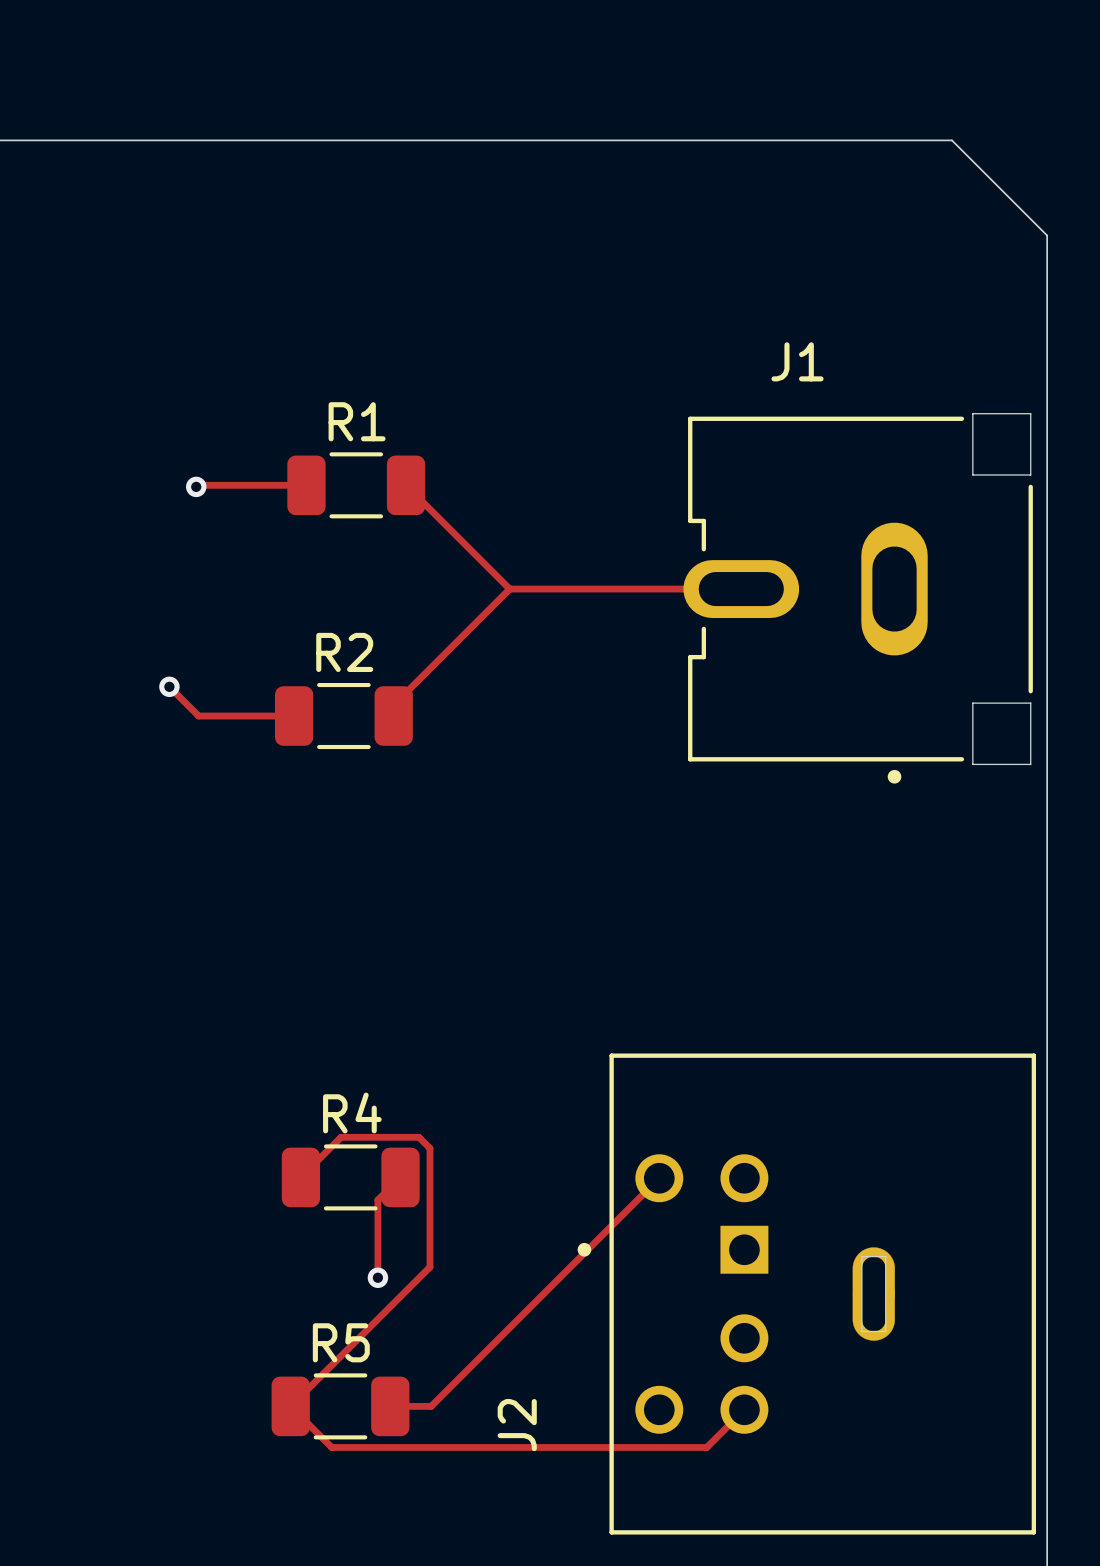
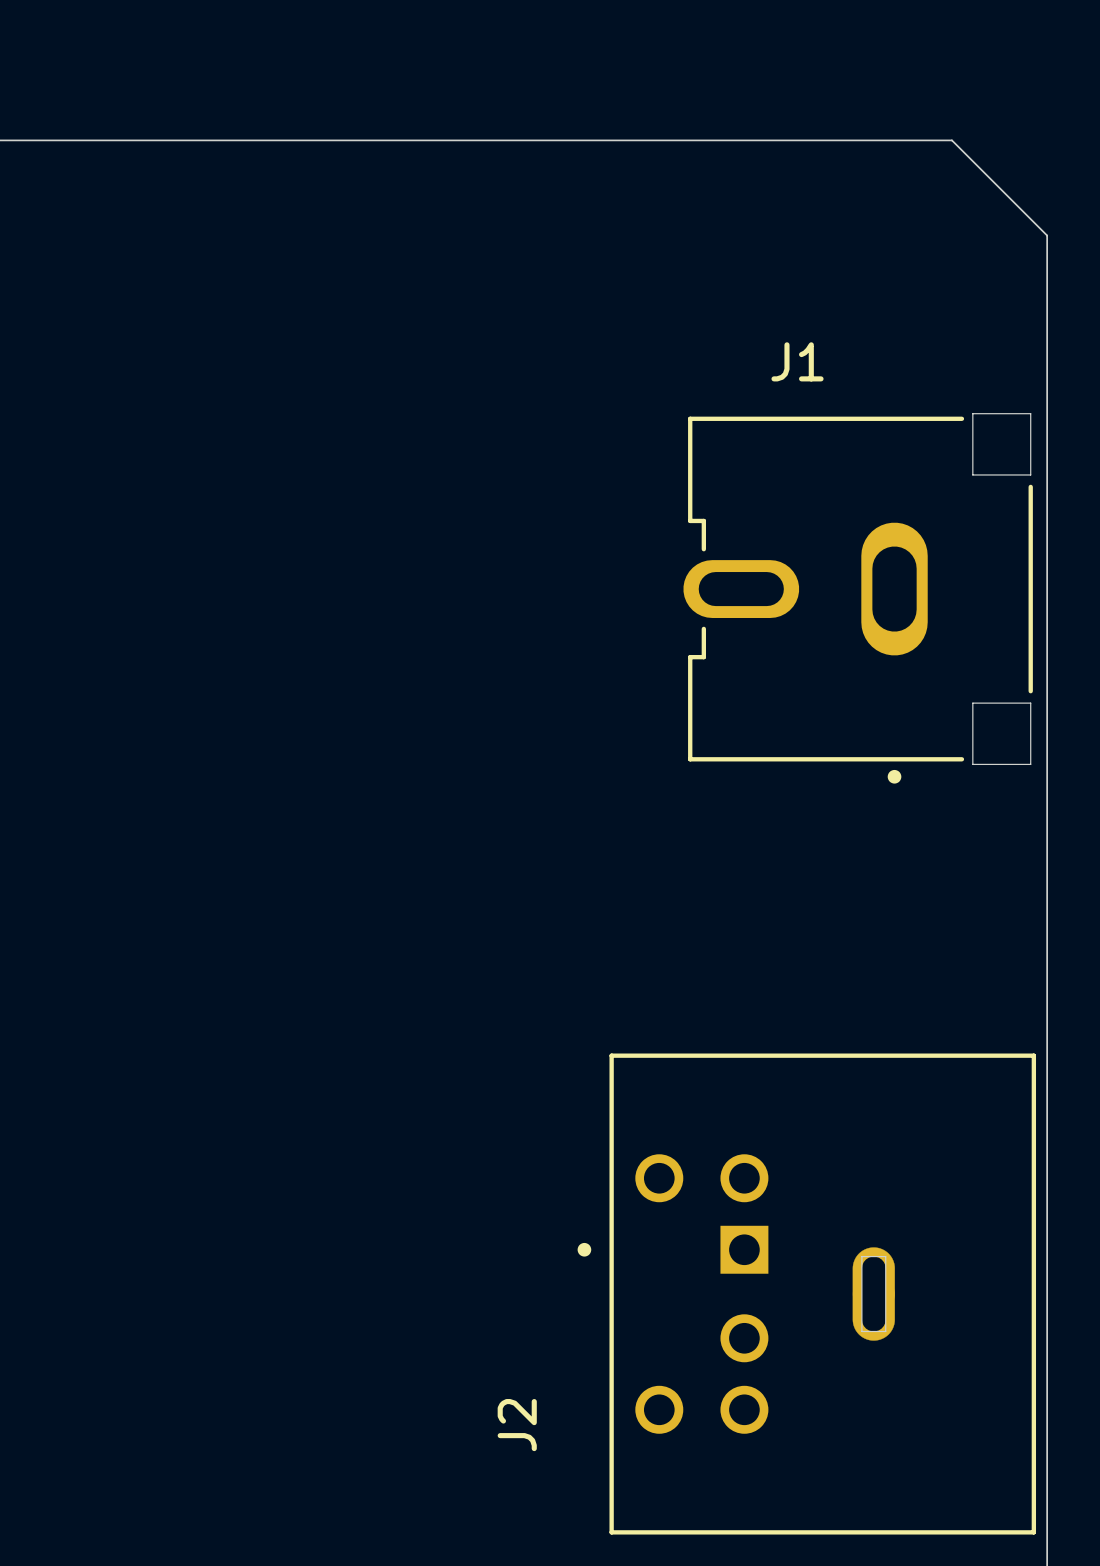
track: (306, 485) (197, 485) (196, 486) -> none
R1: (356, 485) -> none
track: (406, 485) (509, 589) -> none
via: (196, 486) -> none
track: (509, 589) (741, 589) -> none
track: (509, 589) (393, 705) (393, 716) -> none
track: (169, 686) (198, 716) (294, 716) -> none
via: (169, 686) -> none
R2: (343, 716) -> none
track: (300, 1177) (341, 1137) (418, 1137) (429, 1148) (429, 1267) (290, 1406) (331, 1447) (706, 1447) (744, 1409) -> none
R4: (350, 1177) -> none
track: (400, 1177) (377, 1199) (377, 1277) -> none
track: (659, 1178) (431, 1406) (390, 1406) -> none
via: (377, 1277) -> none
R5: (340, 1406) -> none

